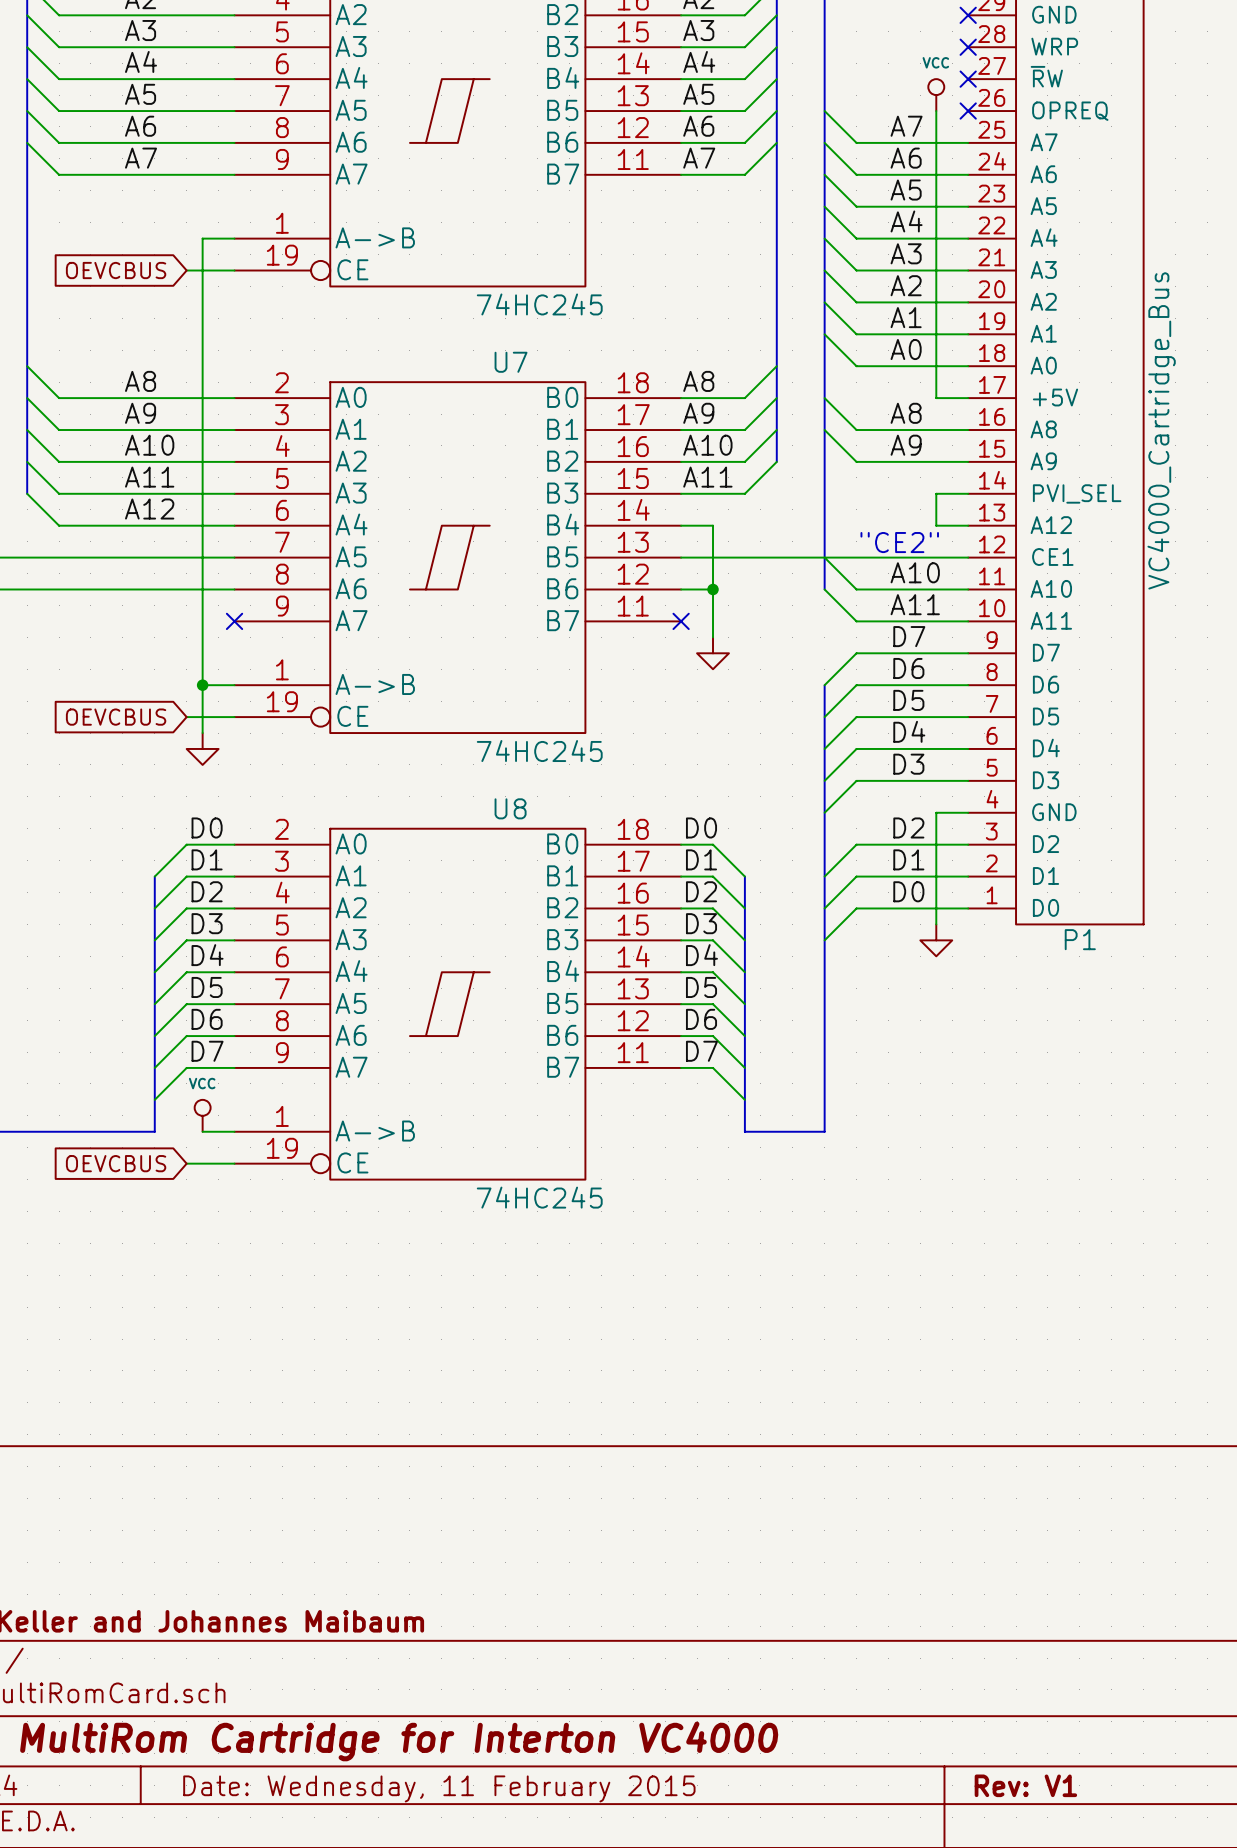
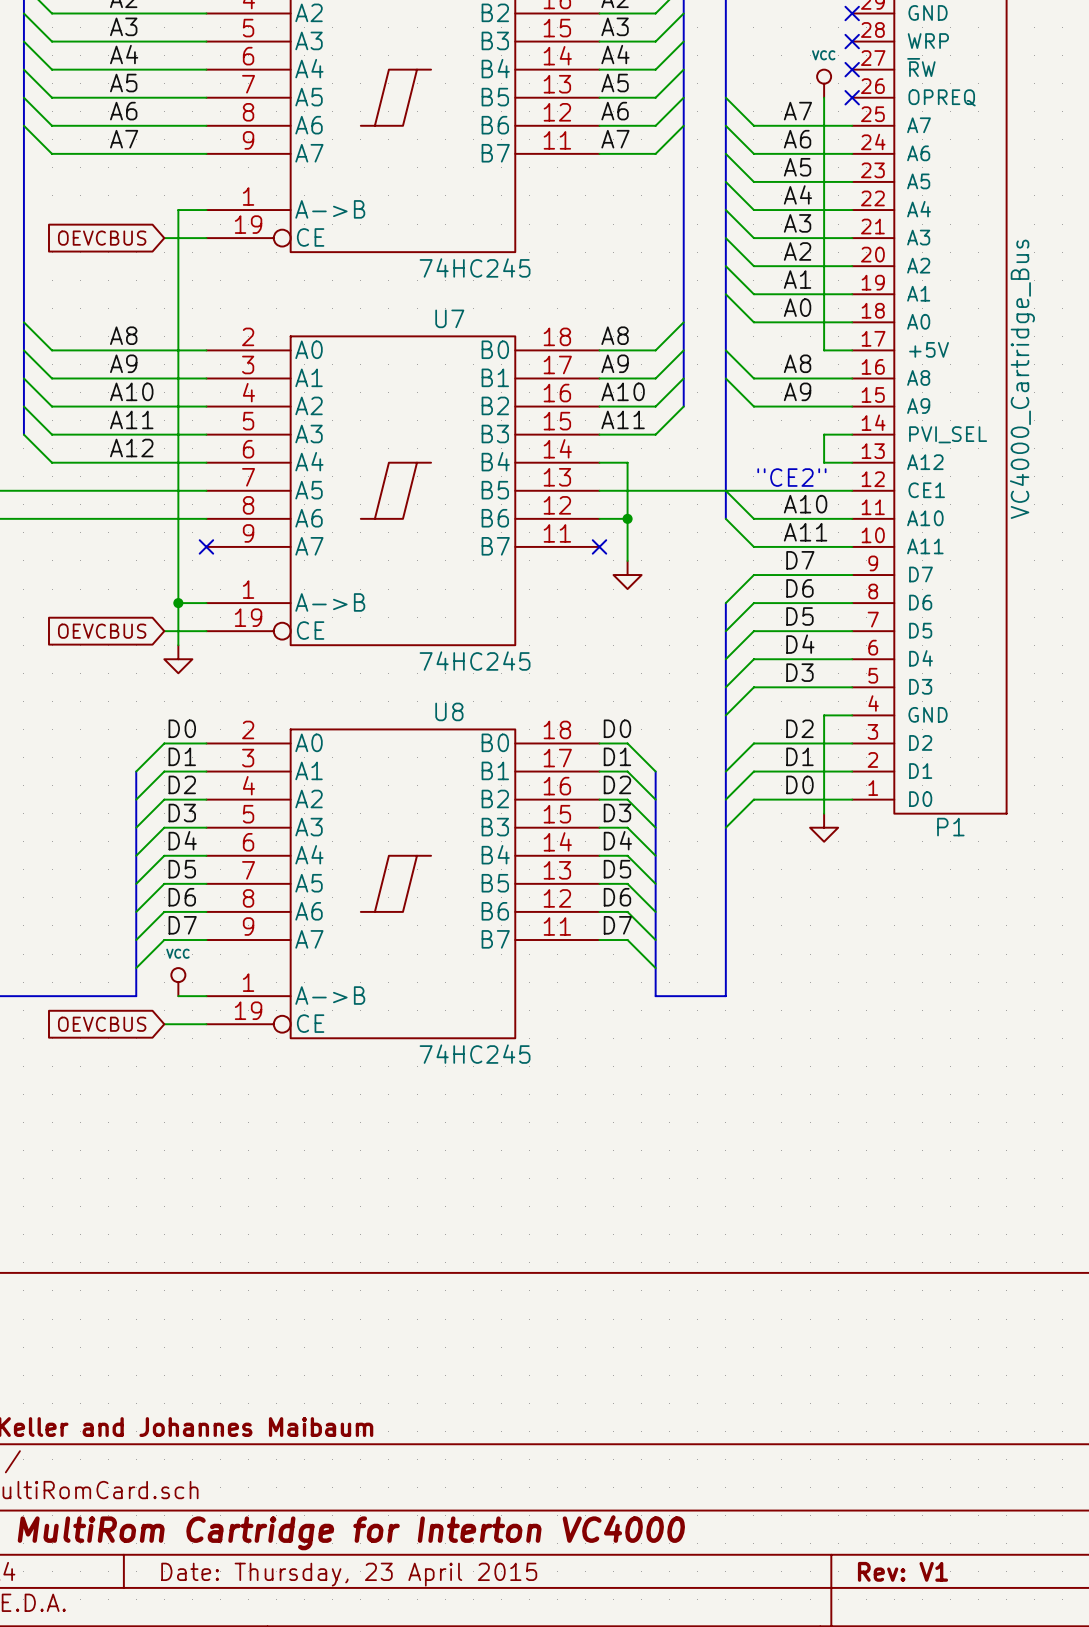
title block: Date: Wednesday, 11 February 2015 (439, 1788) -> Date: Thursday, 23 April 2015 (349, 1574)

